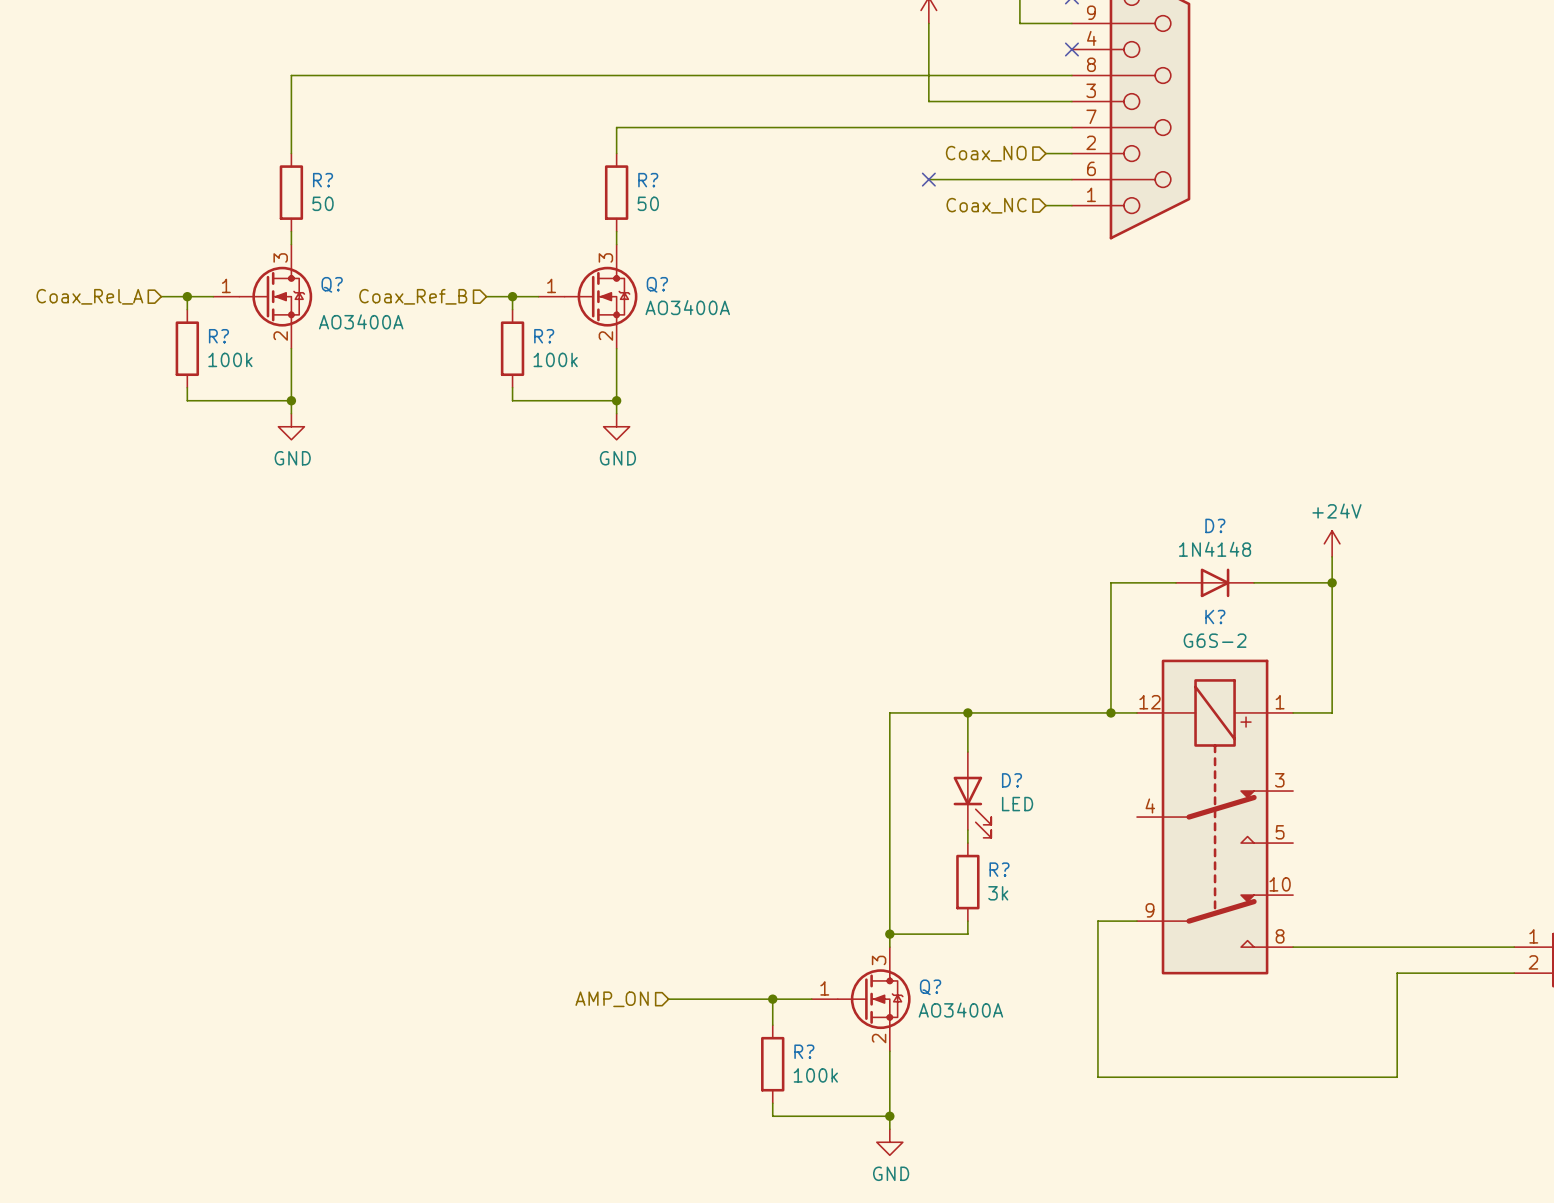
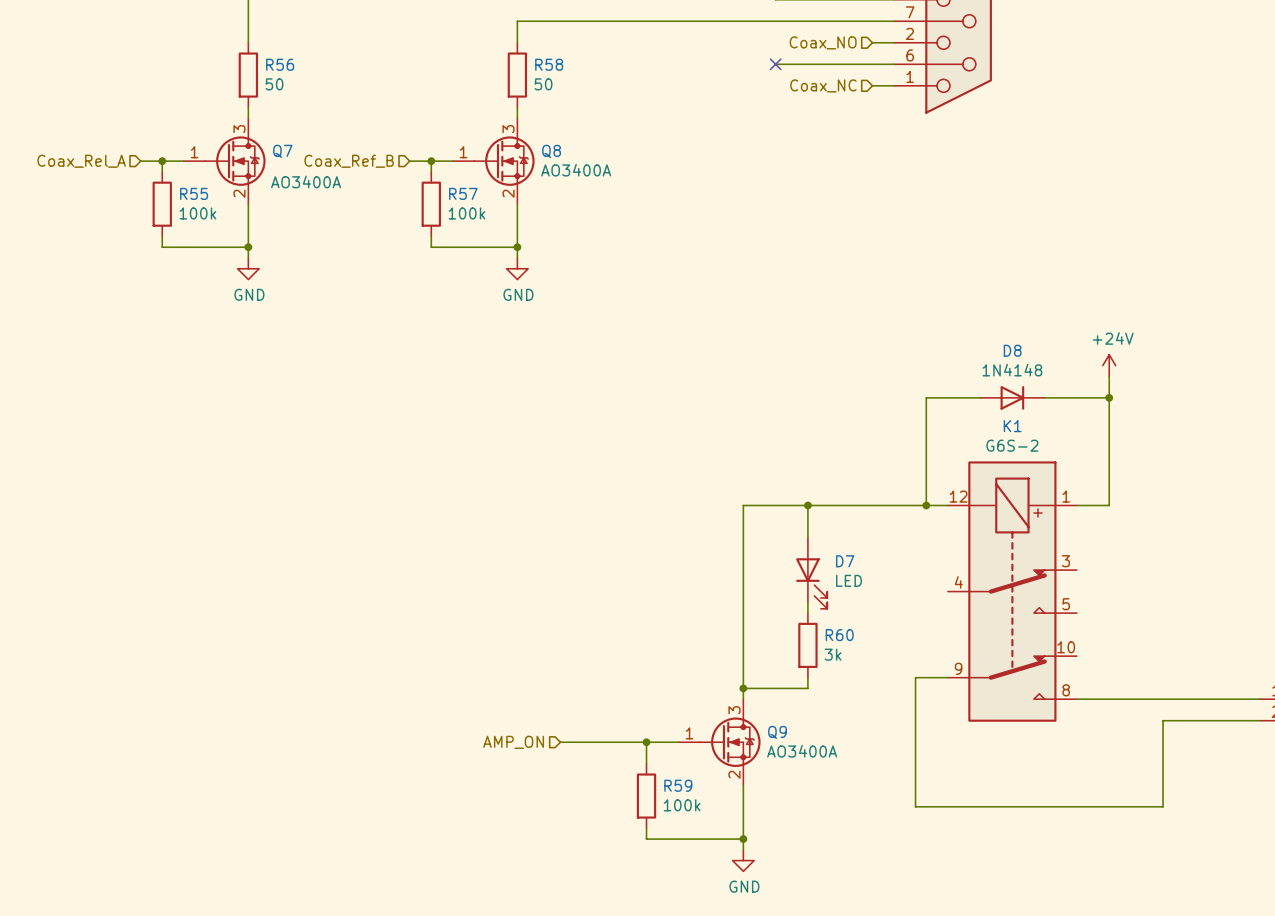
R? name: R? (323, 180) -> R56 (280, 64)
R? name: R? (648, 180) -> R58 (549, 64)
Q? name: Q? (332, 284) -> Q7 (282, 151)
Q? name: Q? (657, 284) -> Q8 (551, 151)
R? name: R? (218, 336) -> R55 (194, 193)
R? name: R? (544, 336) -> R57 (463, 193)
D? name: D? (1215, 525) -> D8 (1012, 350)
K? name: K? (1215, 616) -> K1 (1012, 426)
D? name: D? (1011, 780) -> D7 (845, 561)
R? name: R? (999, 869) -> R60 (839, 635)
Q? name: Q? (930, 987) -> Q9 (777, 732)
R? name: R? (804, 1051) -> R59 (678, 785)

